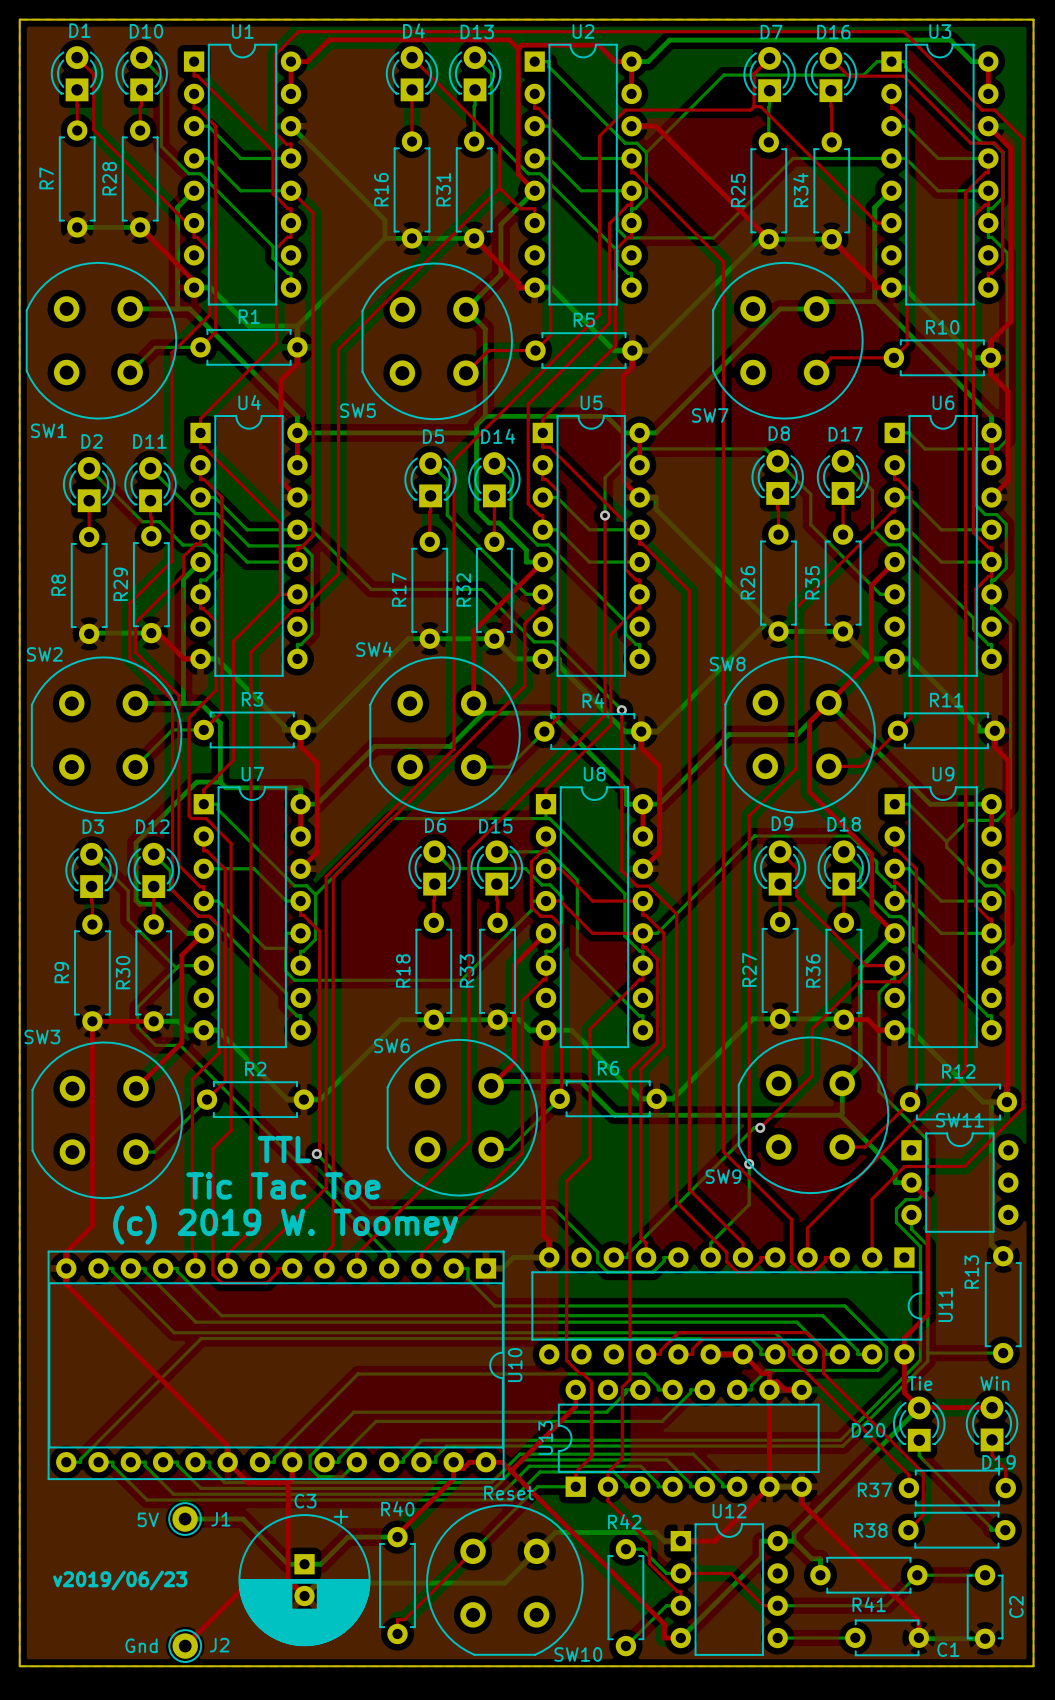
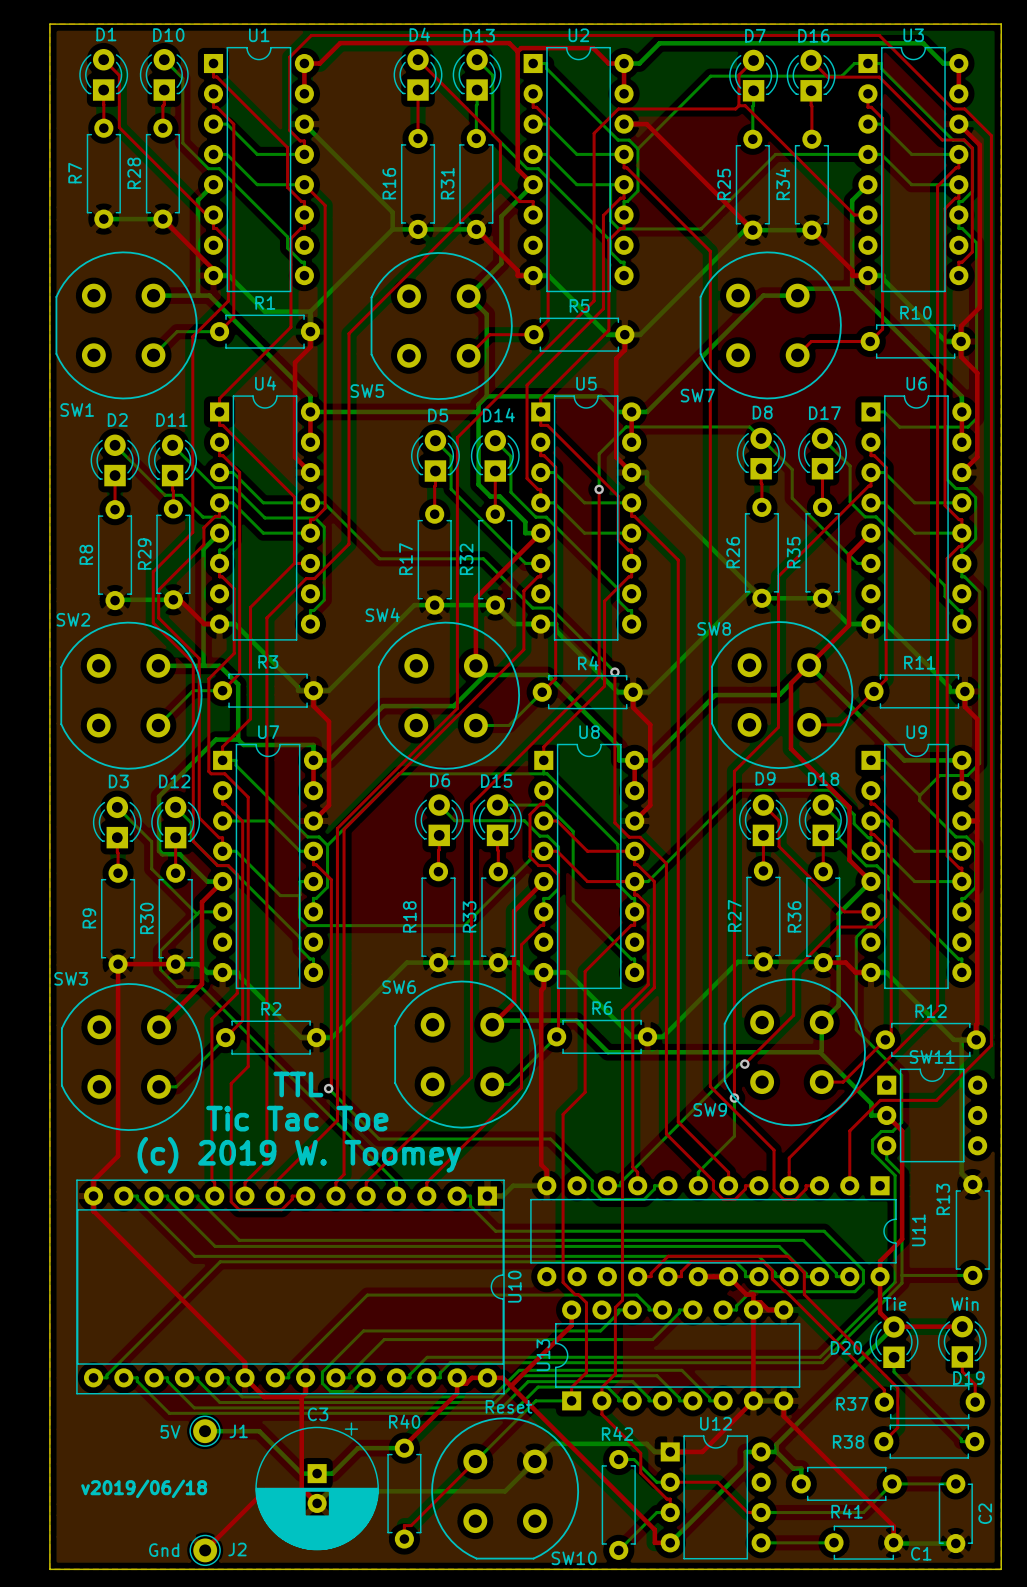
text: v2019/06/23 (120, 1580) -> v2019/06/18 (144, 1488)

